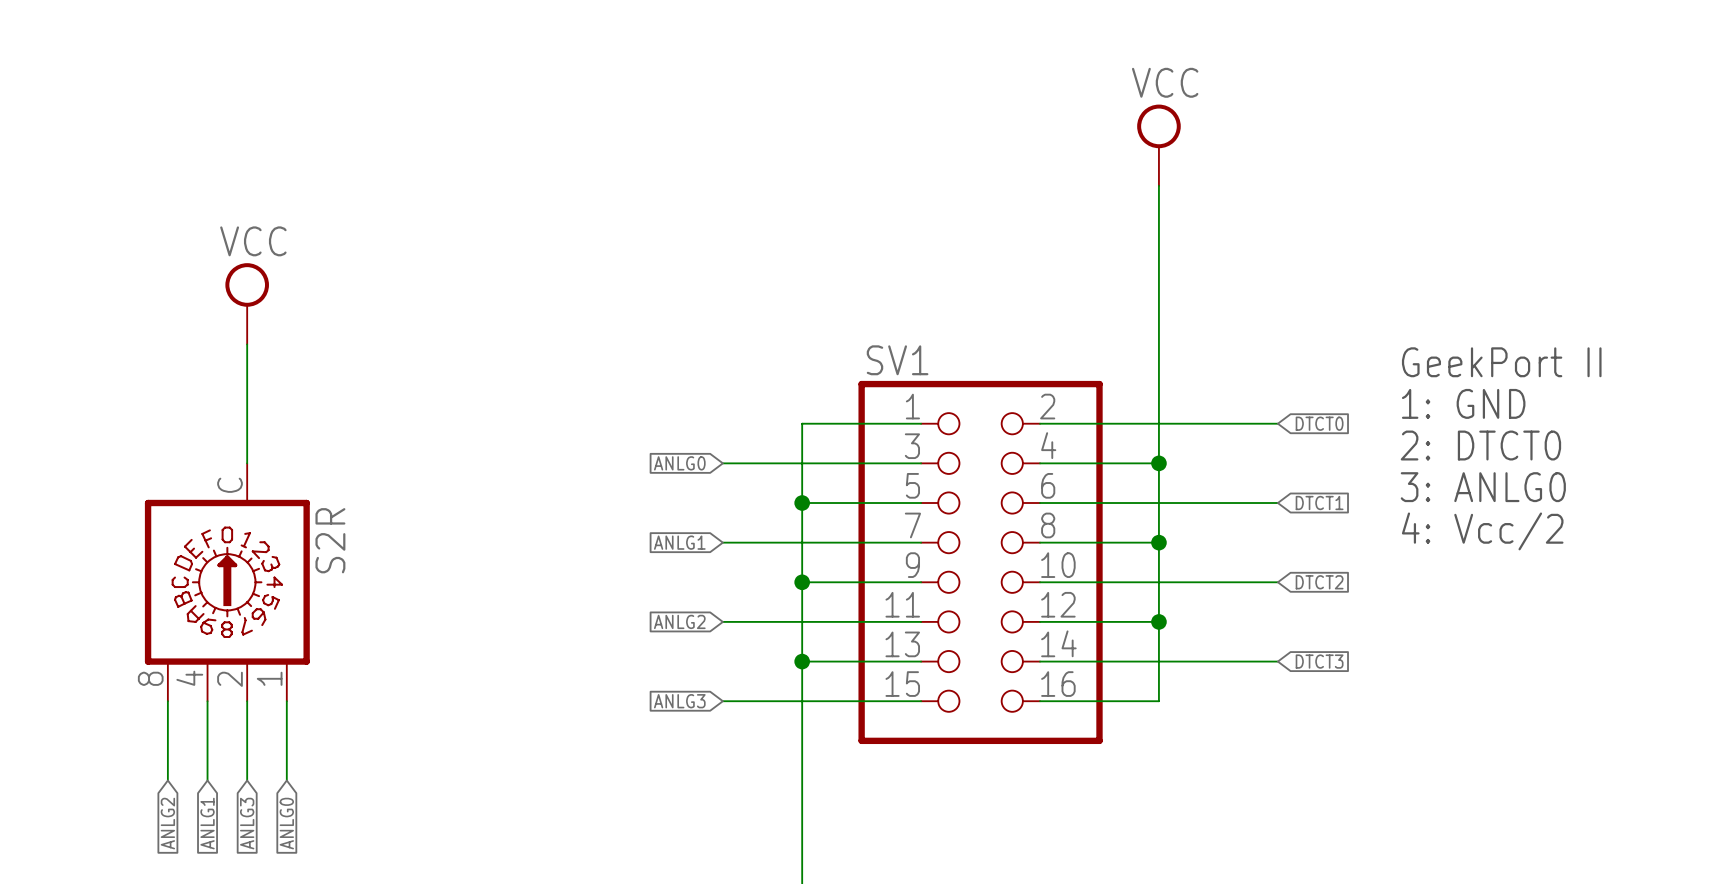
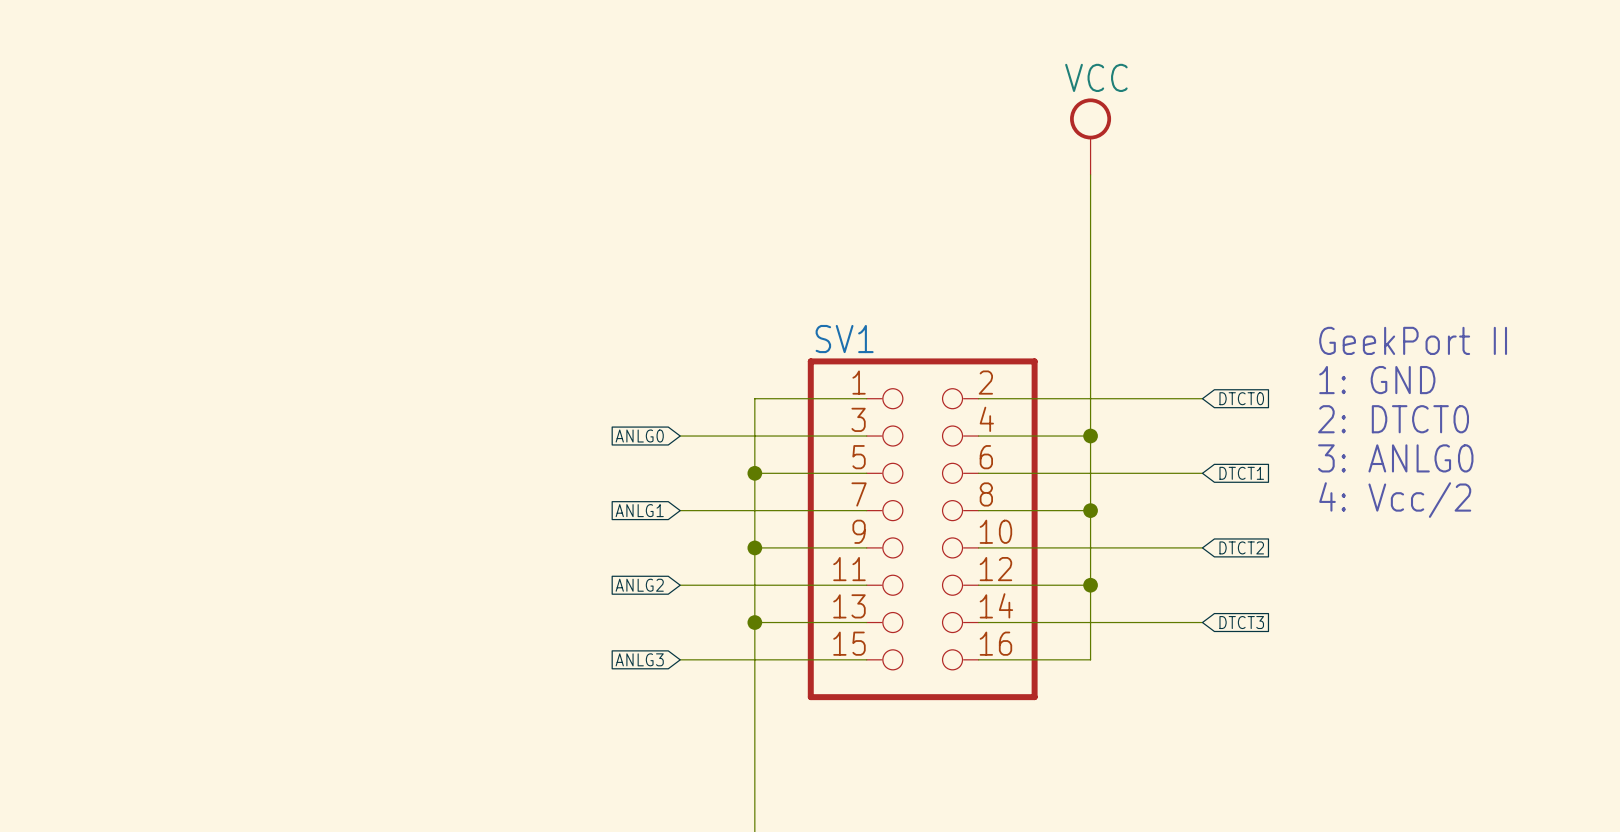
power symbol: VCC (247, 303) -> none
wire: (247, 344) (247, 463) -> none
S2R: (227, 582) -> none
wire: (167, 701) (167, 780) -> none
wire: (207, 701) (207, 780) -> none
wire: (247, 701) (247, 780) -> none
wire: (286, 701) (286, 780) -> none
global label: ANLG2 (167, 823) -> none
global label: ANLG1 (207, 823) -> none
global label: ANLG3 (247, 823) -> none
global label: ANLG0 (286, 823) -> none

